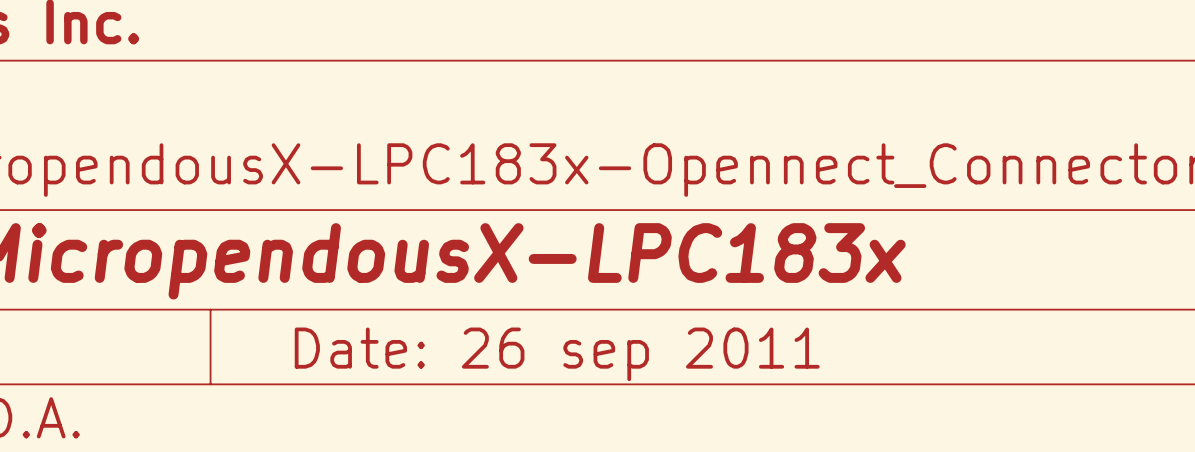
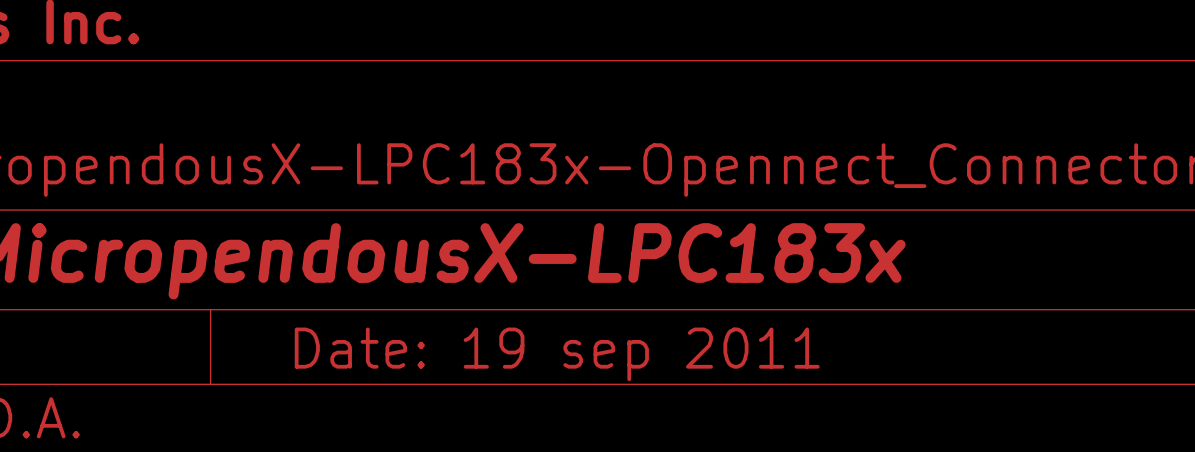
title block: Date: 26 sep 2011 (557, 354) -> Date: 19 sep 2011 (557, 354)

